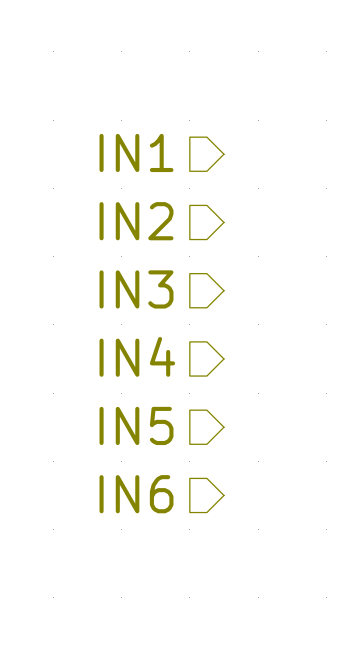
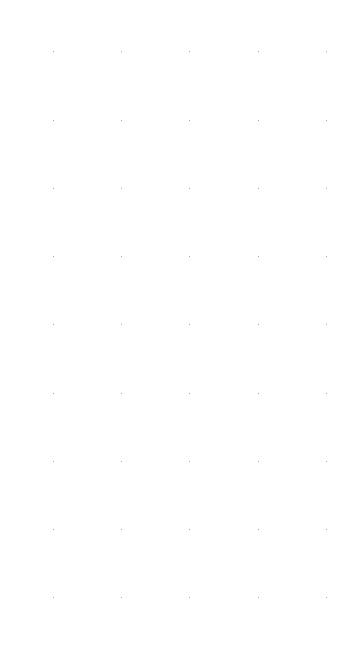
hierarchical label: IN1 (136, 152) -> none
hierarchical label: IN2 (136, 221) -> none
hierarchical label: IN3 (136, 289) -> none
hierarchical label: IN4 (137, 356) -> none
hierarchical label: IN5 (136, 425) -> none
hierarchical label: IN6 (136, 494) -> none

